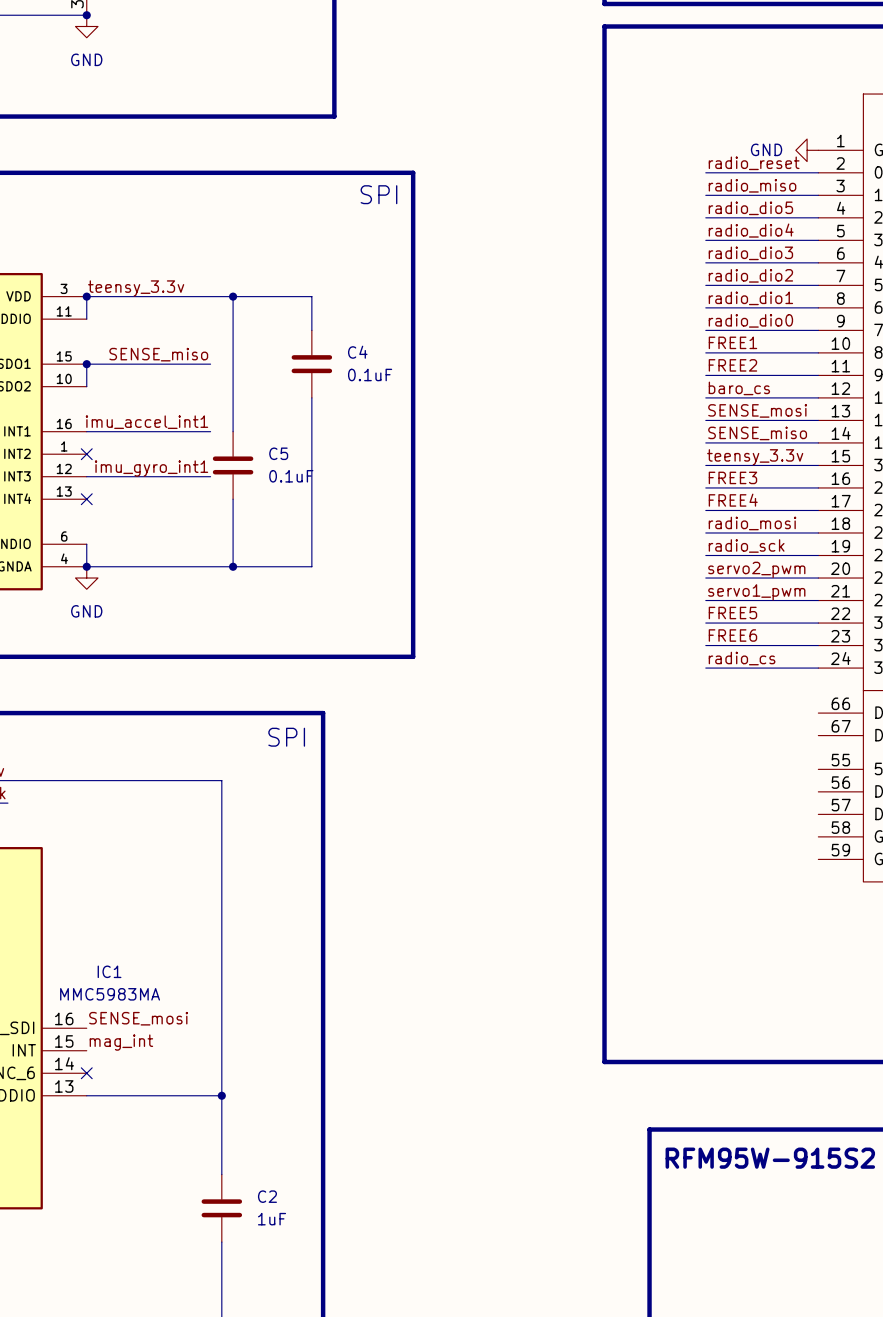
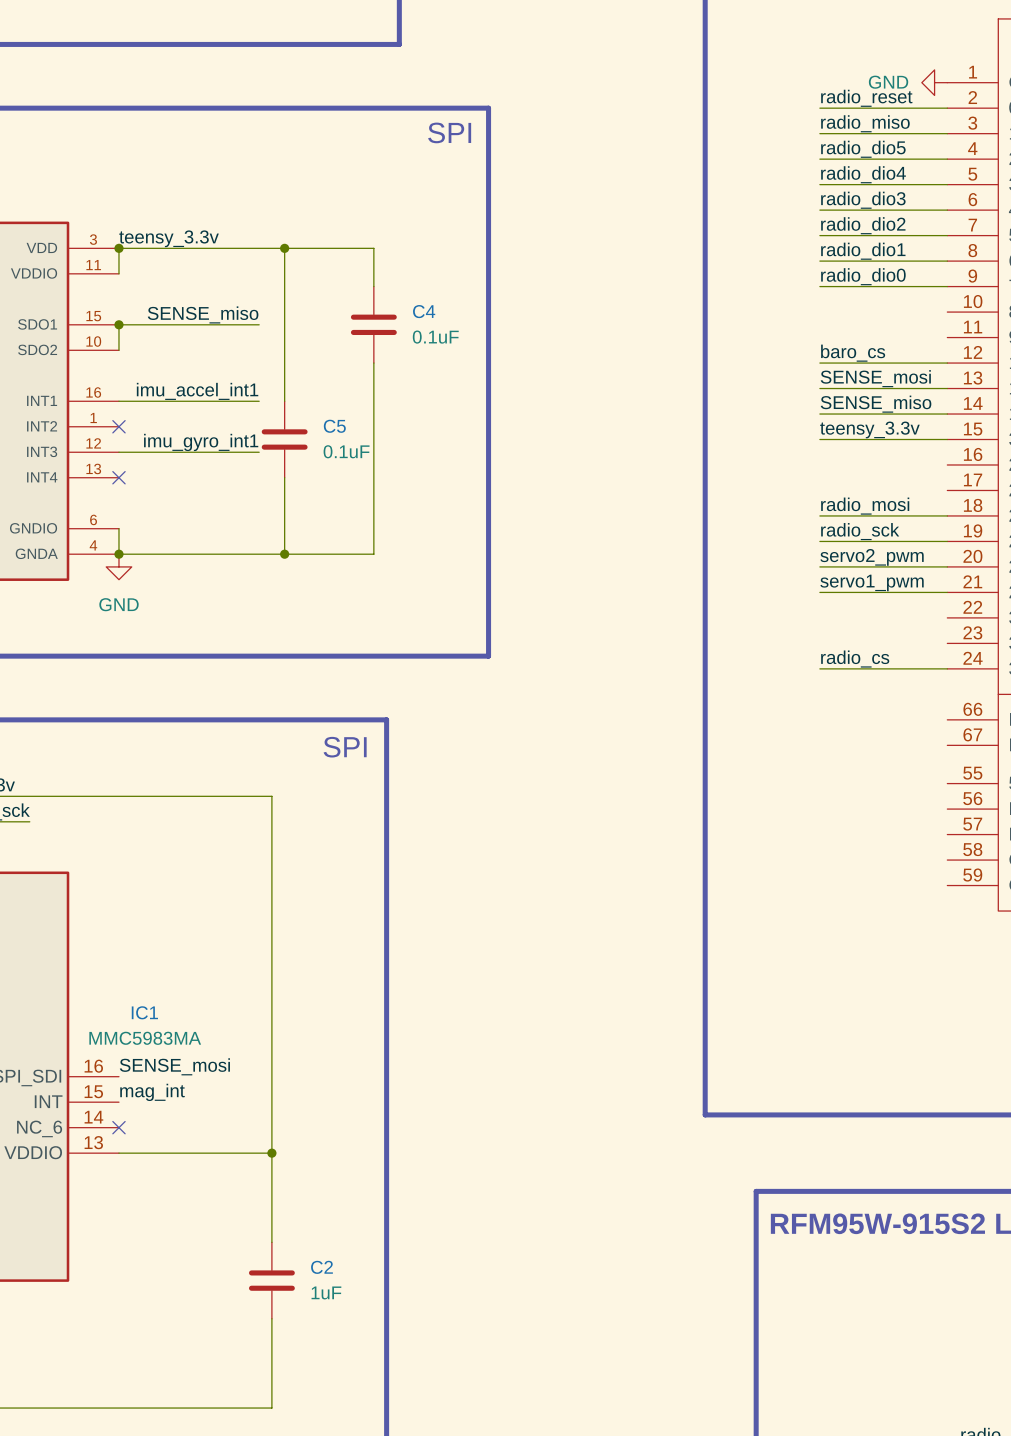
label: FREE1 (732, 342) -> none
wire: (705, 352) (818, 352) -> none
label: FREE2 (732, 365) -> none
wire: (705, 375) (818, 375) -> none
label: FREE3 (732, 477) -> none
wire: (705, 487) (818, 487) -> none
label: FREE4 (733, 500) -> none
wire: (705, 510) (818, 510) -> none
label: FREE5 (732, 612) -> none
wire: (705, 623) (818, 623) -> none
label: FREE6 (732, 635) -> none
wire: (705, 645) (818, 645) -> none

